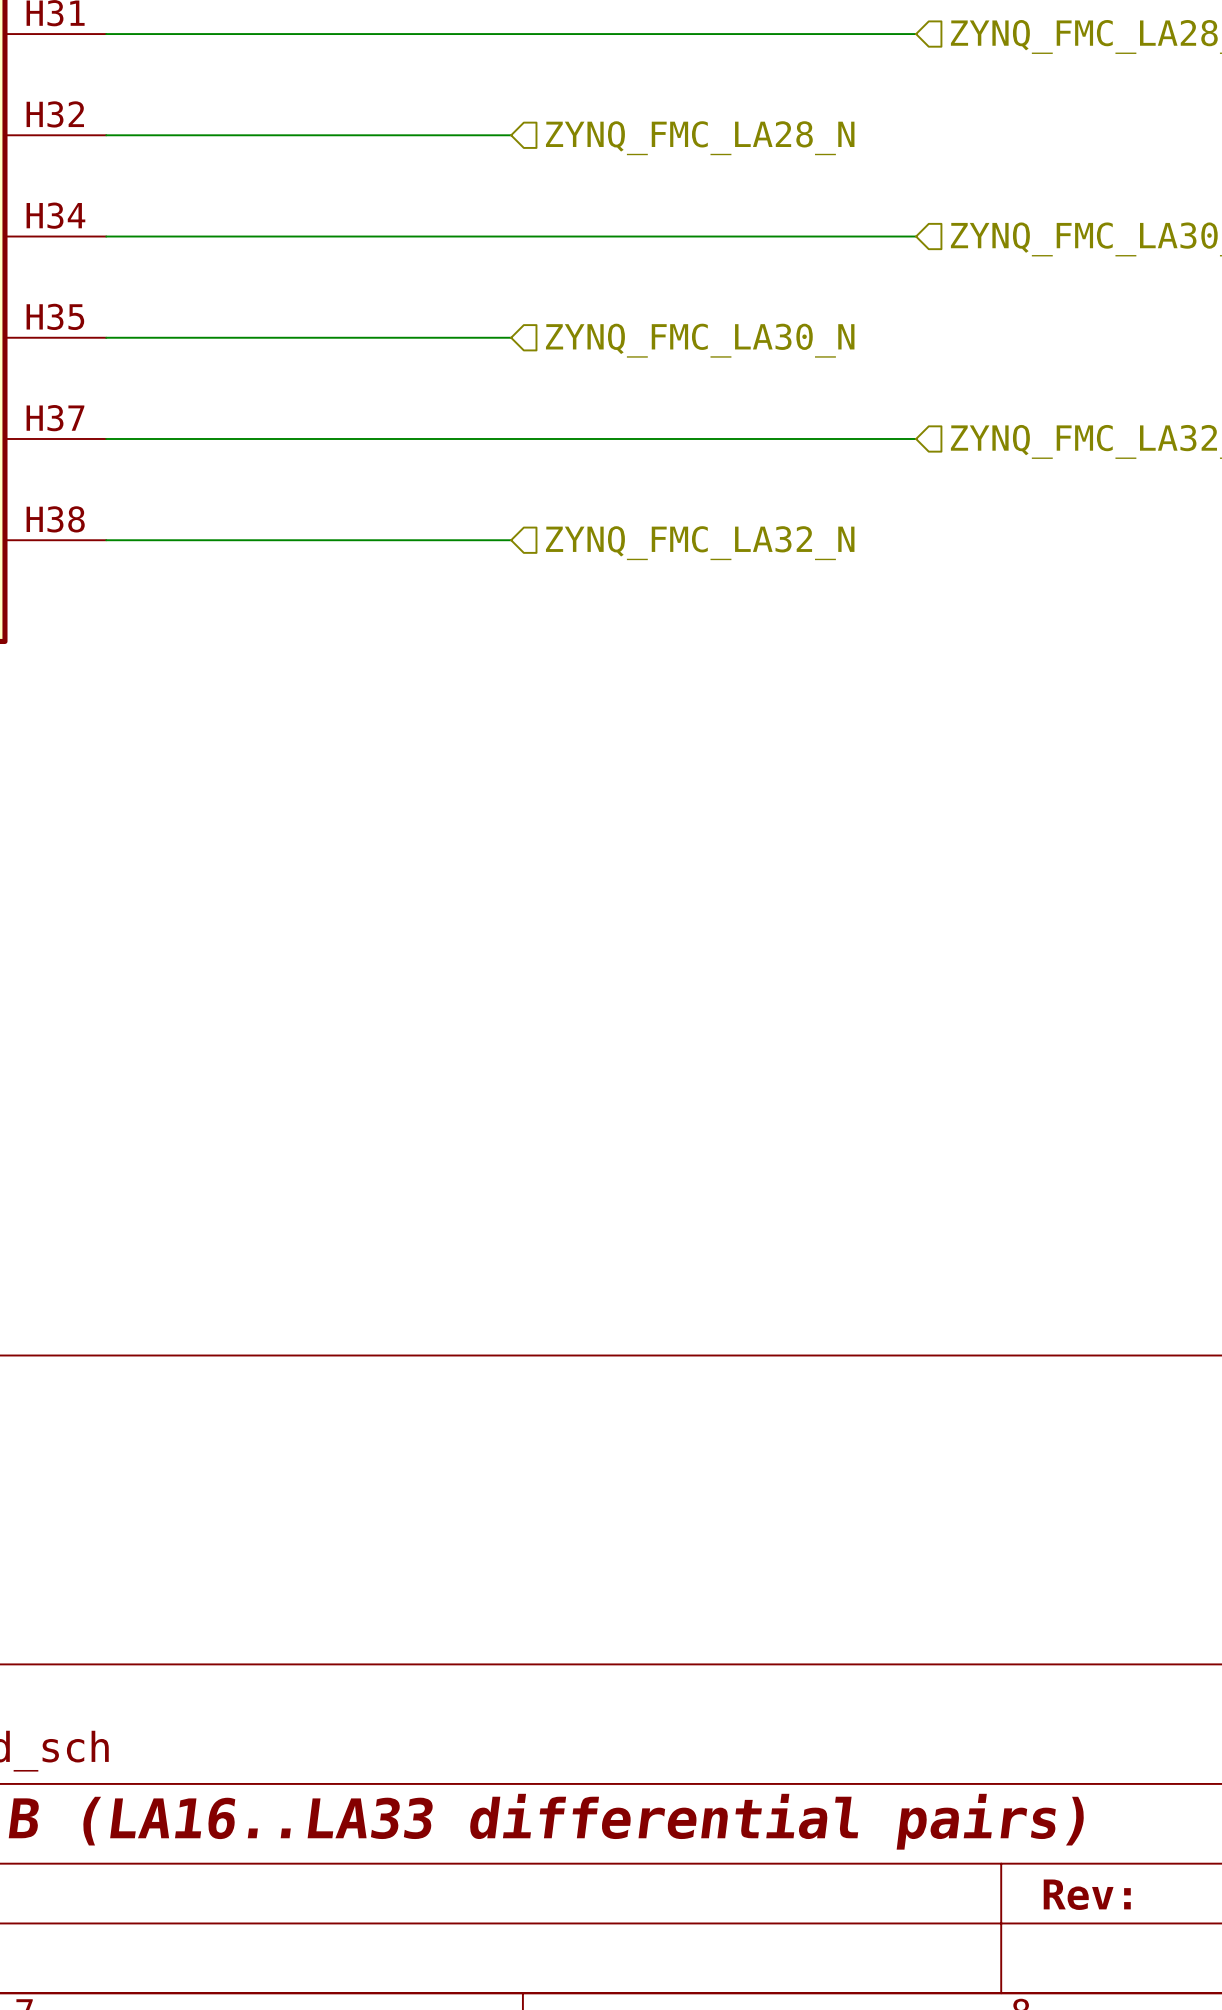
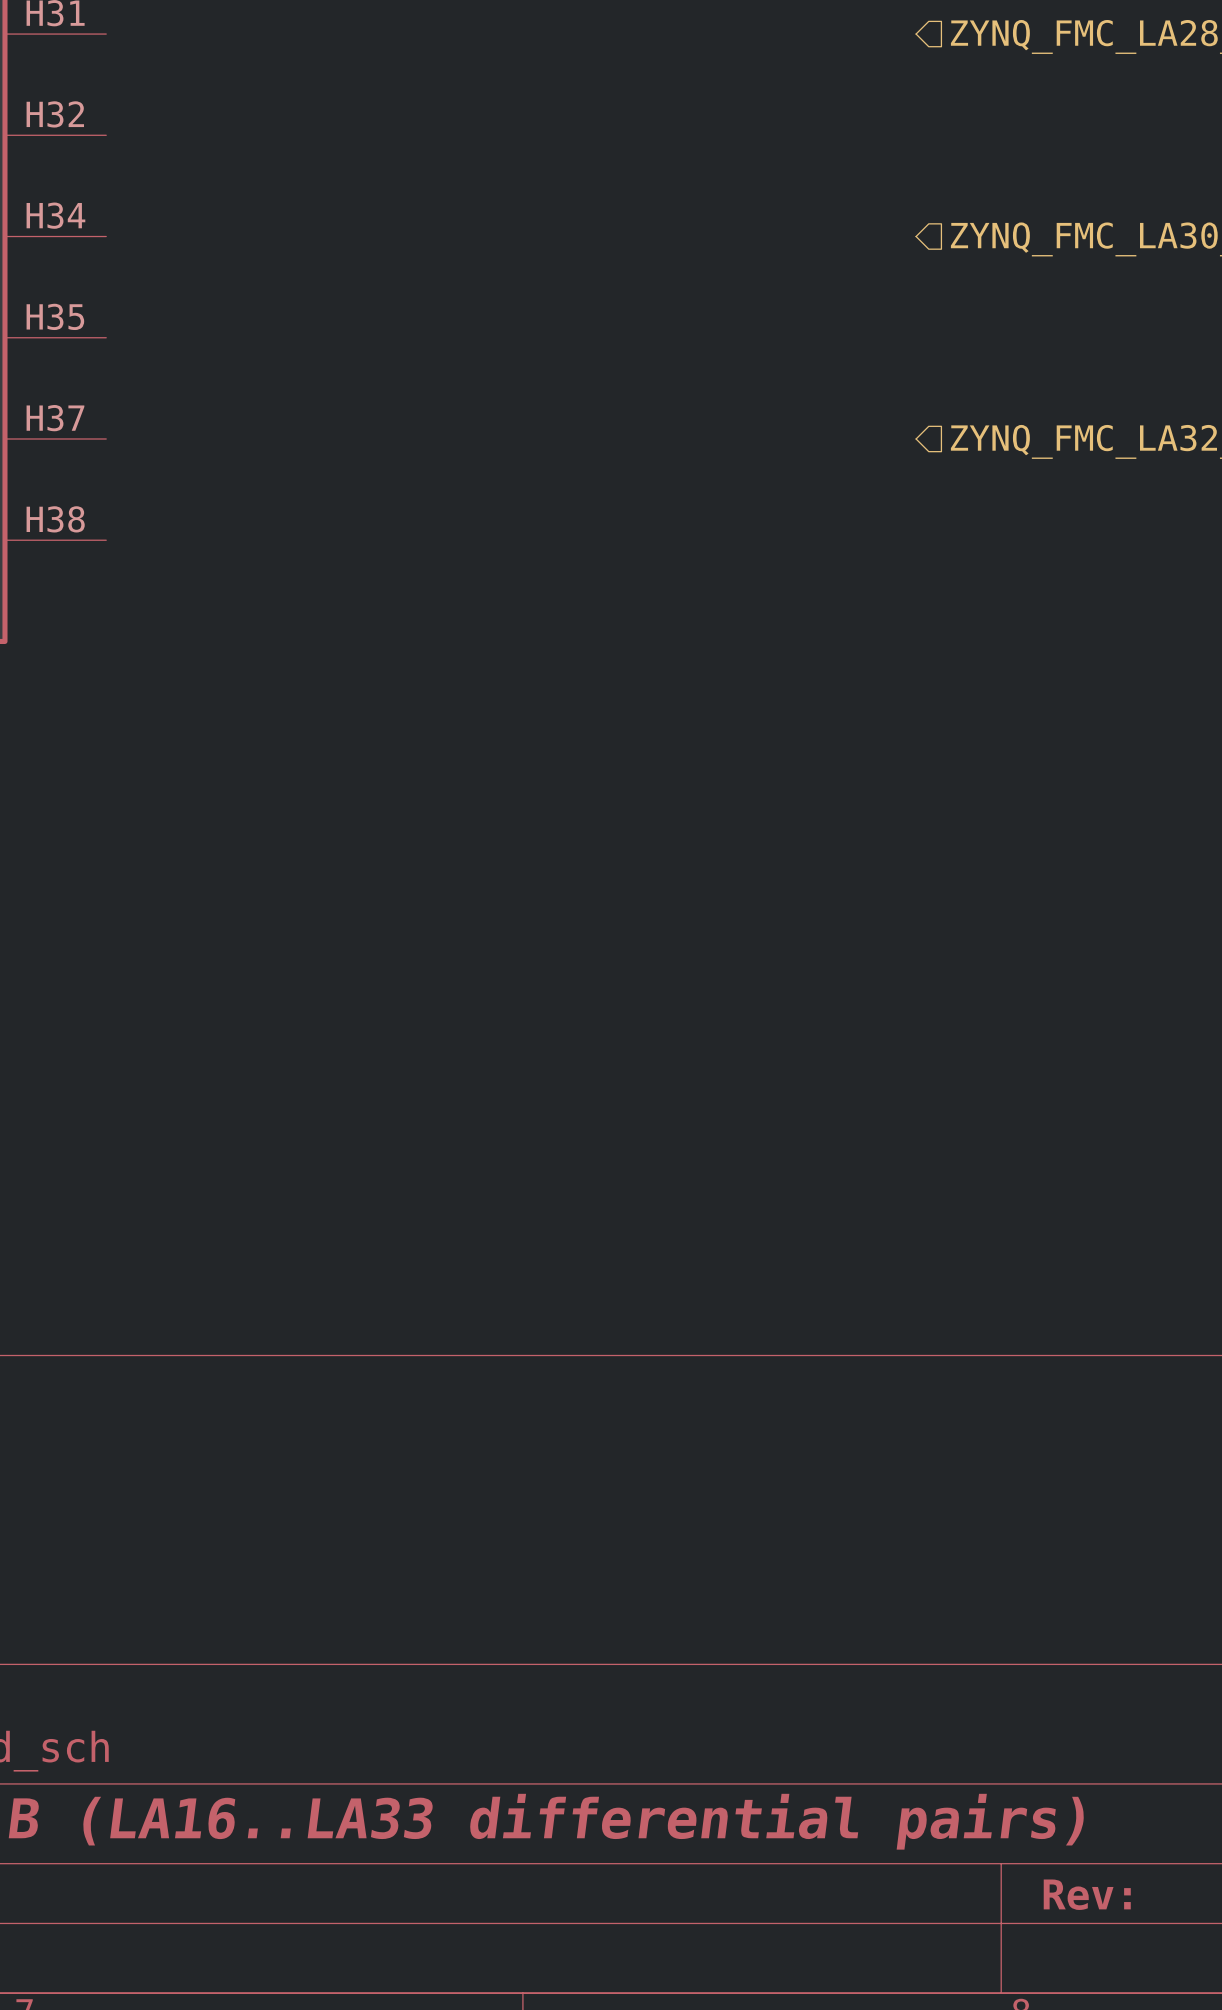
wire: (106, 34) (916, 34) -> none
wire: (106, 135) (511, 135) -> none
hierarchical label: ZYNQ_FMC_LA28_N (700, 138) -> none
wire: (106, 236) (916, 236) -> none
wire: (106, 337) (511, 337) -> none
hierarchical label: ZYNQ_FMC_LA30_N (700, 340) -> none
wire: (106, 438) (916, 438) -> none
wire: (106, 540) (511, 540) -> none
hierarchical label: ZYNQ_FMC_LA32_N (700, 543) -> none

